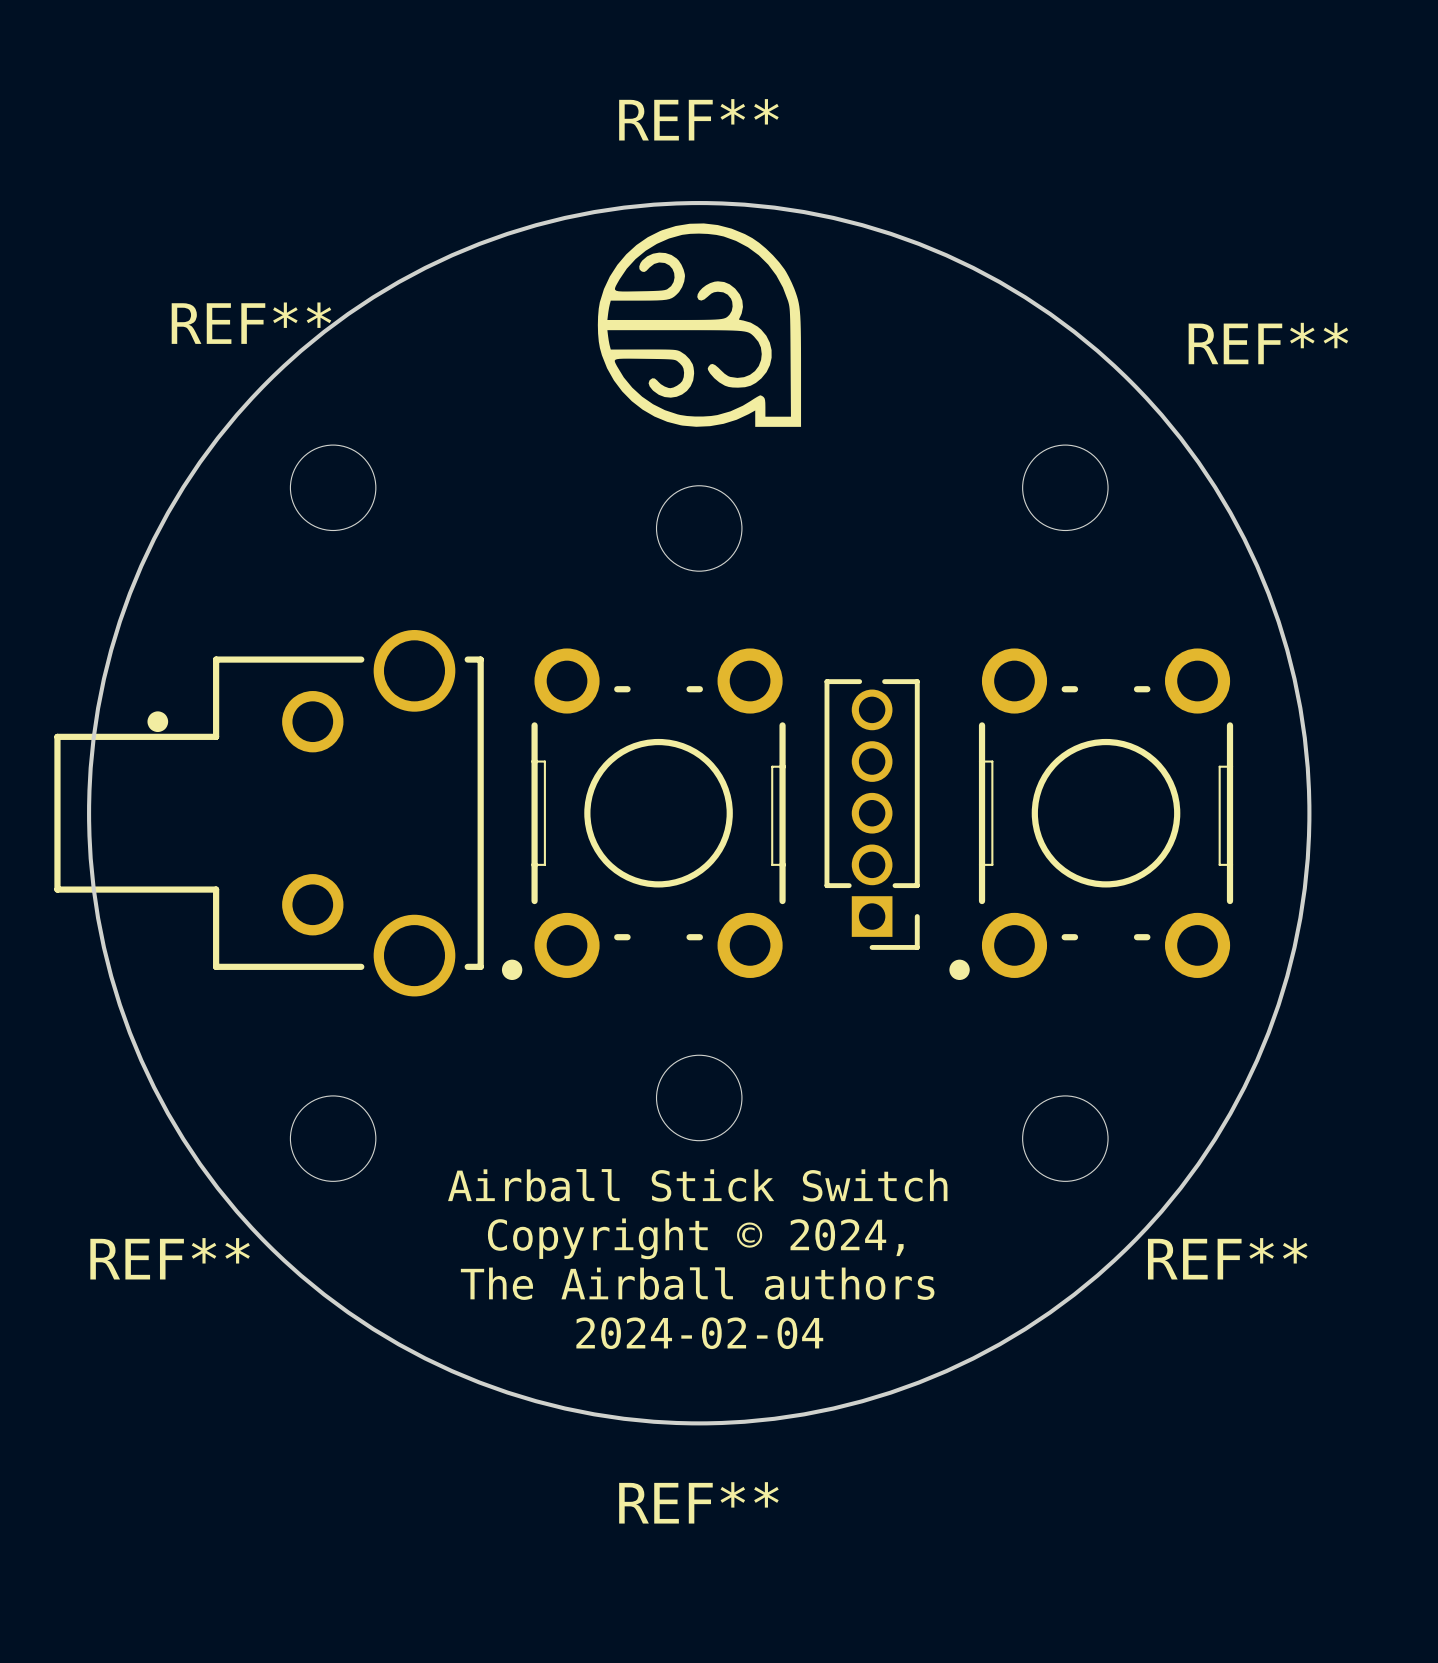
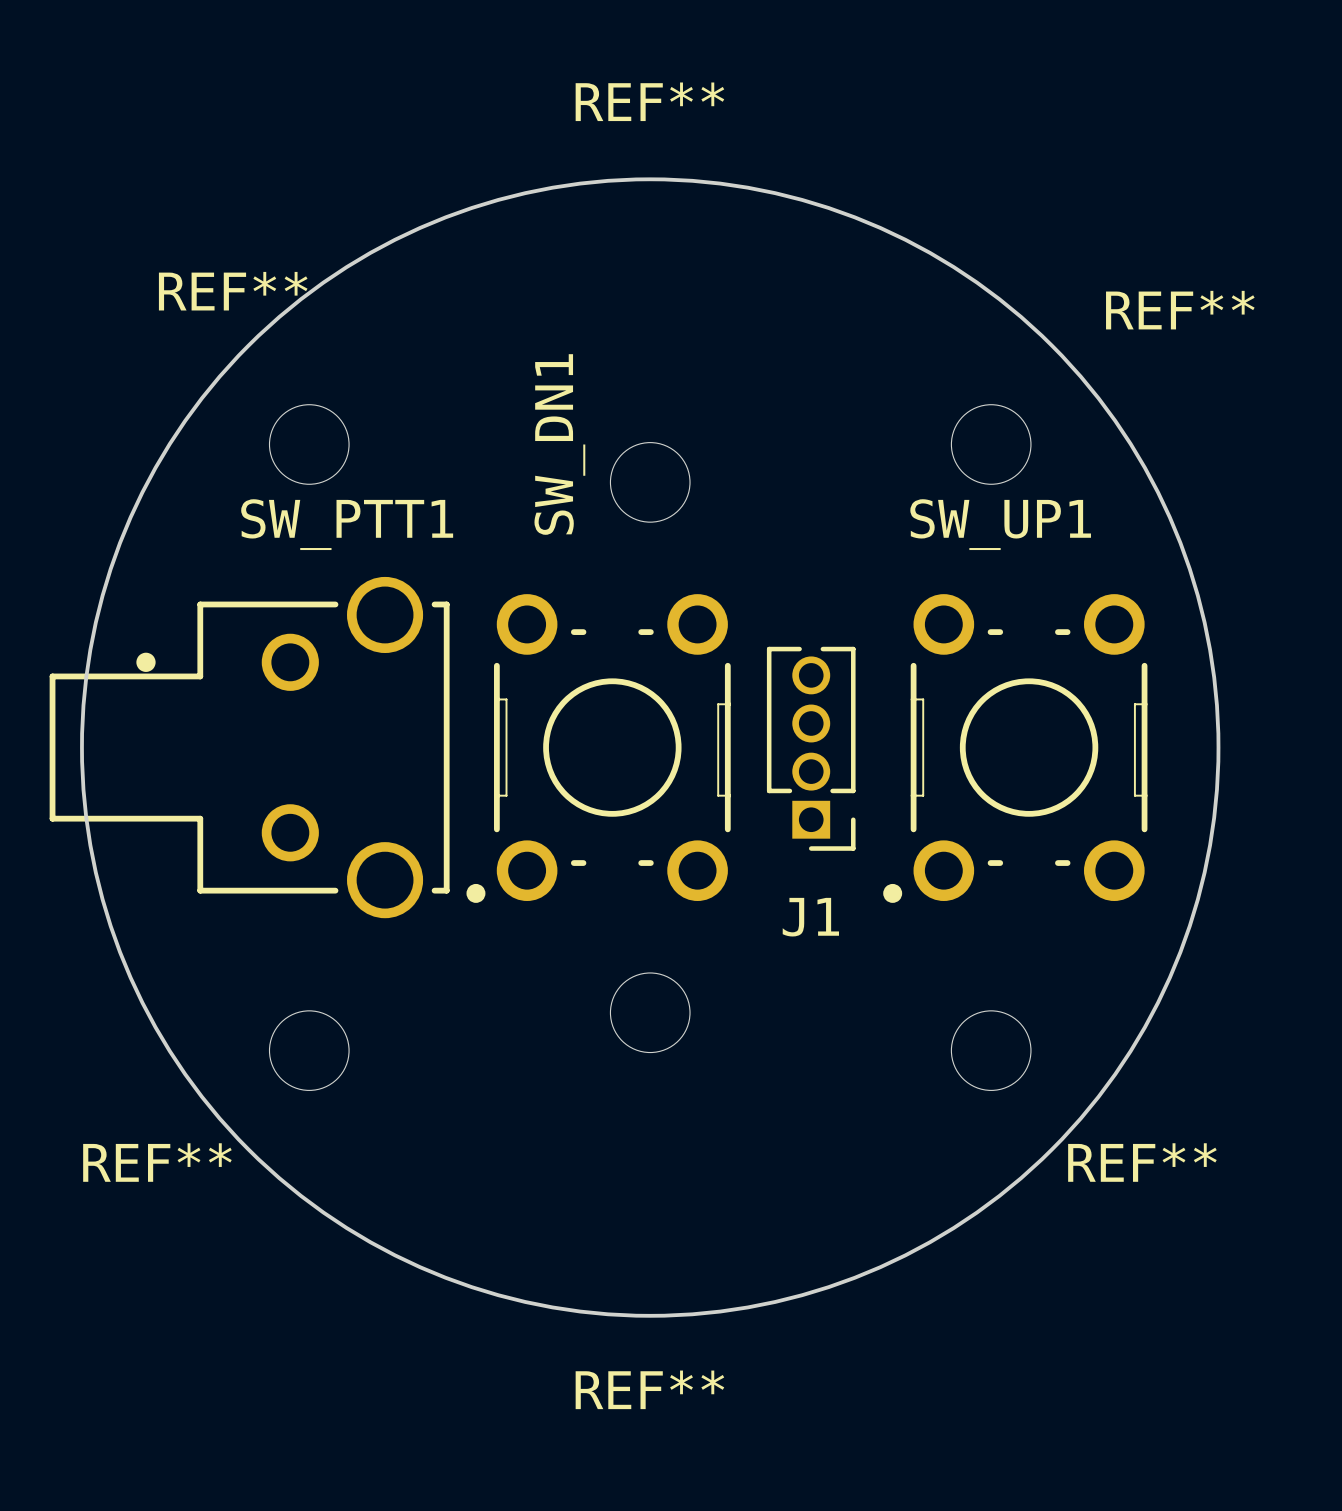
drawing: [597, 223, 802, 427] -> none
SW_DN1 name: none -> SW_DN1 (559, 444)
SW_PTT1 name: none -> SW_PTT1 (347, 524)
SW_UP1 name: none -> SW_UP1 (1000, 524)
part: (872, 814) -> none
J1: none -> (811, 748)
text: Airball Stick Switch (697, 1185) -> none
text: Copyright © 2024, (695, 1238) -> none
text: The Airball authors (697, 1283) -> none
text: 2024-02-04 (699, 1333) -> none

